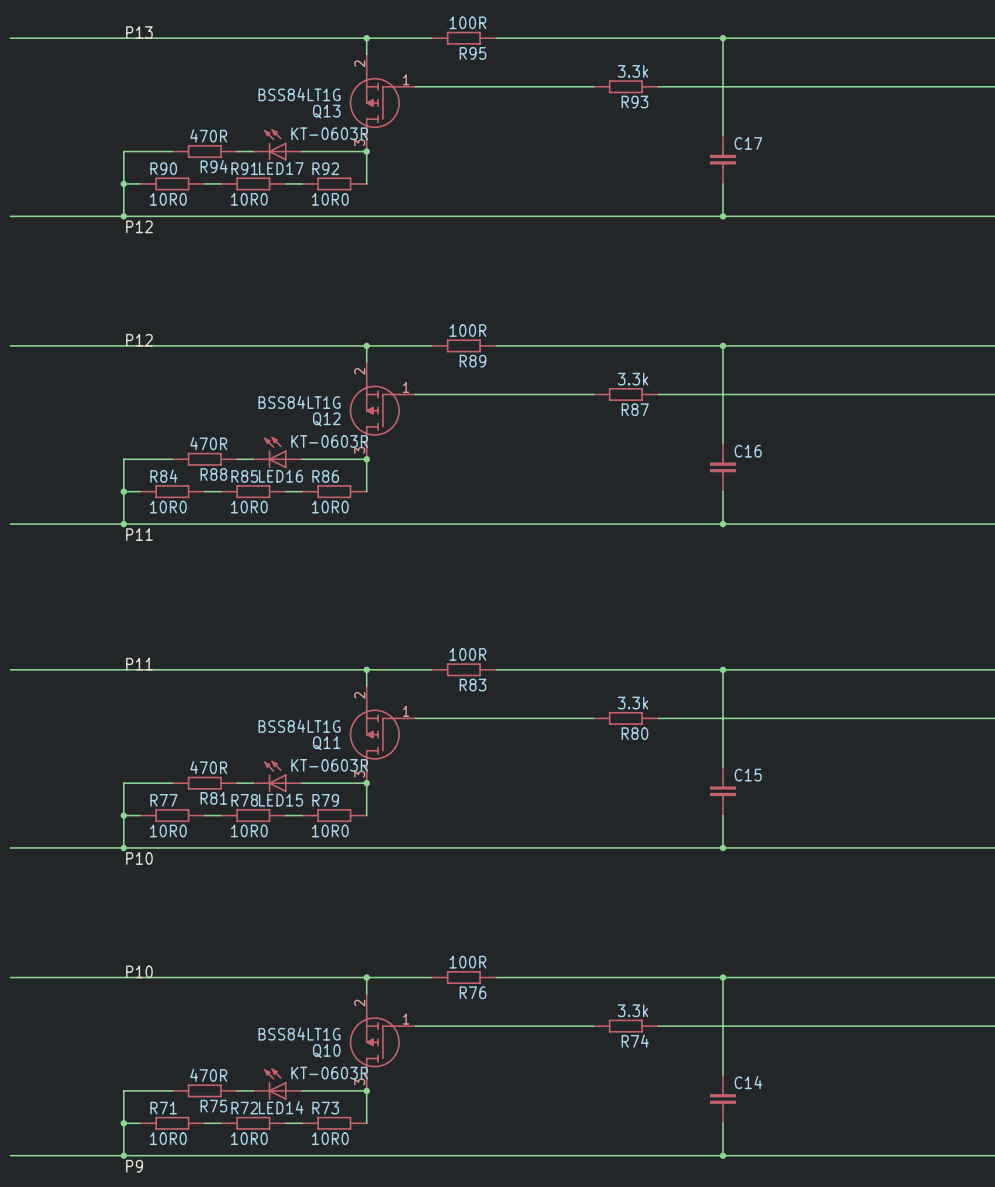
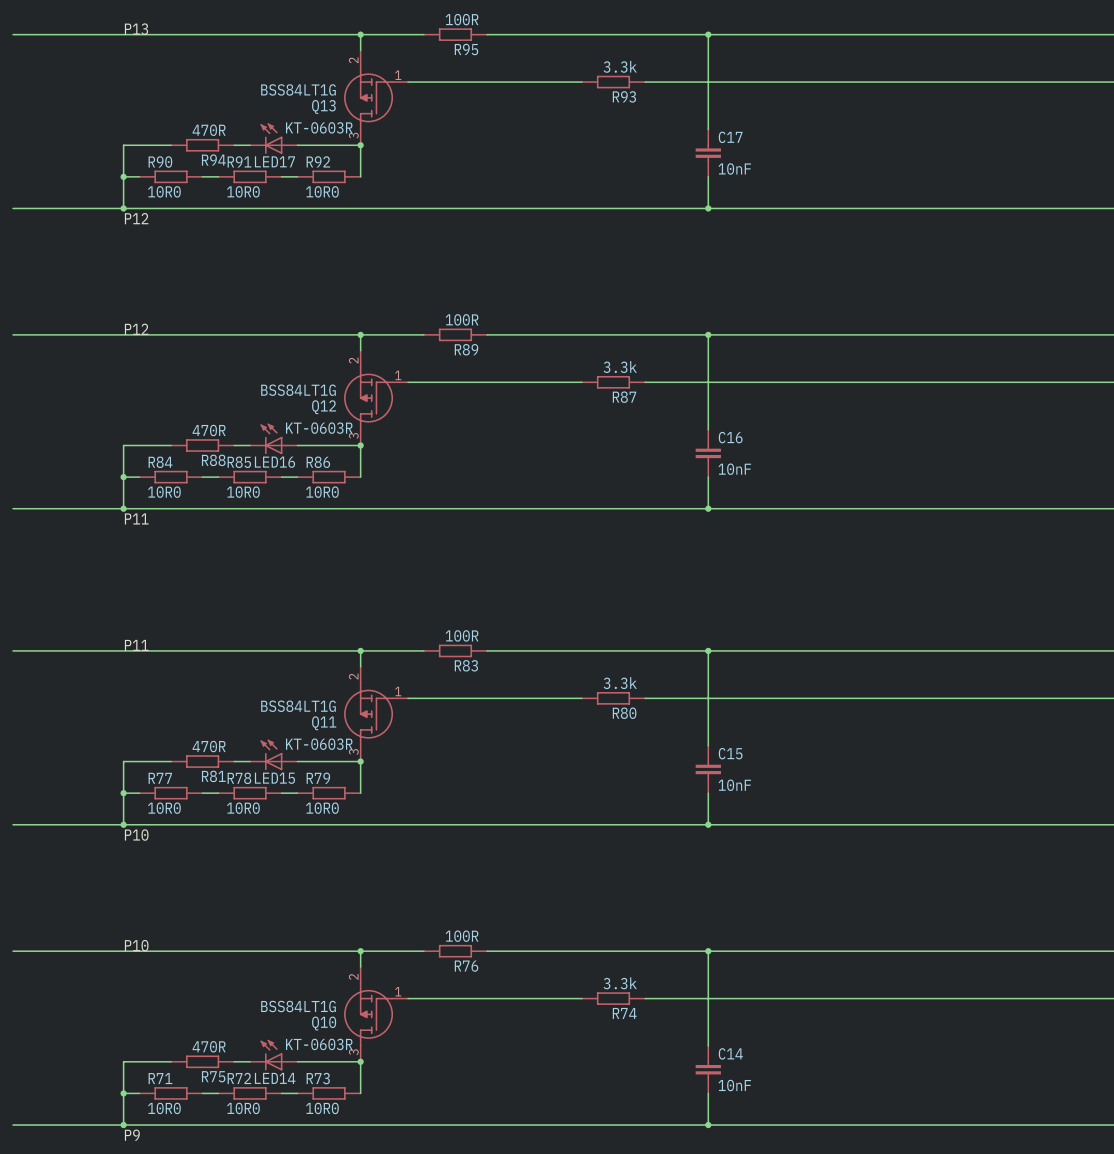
C17 value: none -> 10nF (734, 168)
C16 value: none -> 10nF (734, 469)
C15 value: none -> 10nF (734, 785)
C14 value: none -> 10nF (734, 1085)

